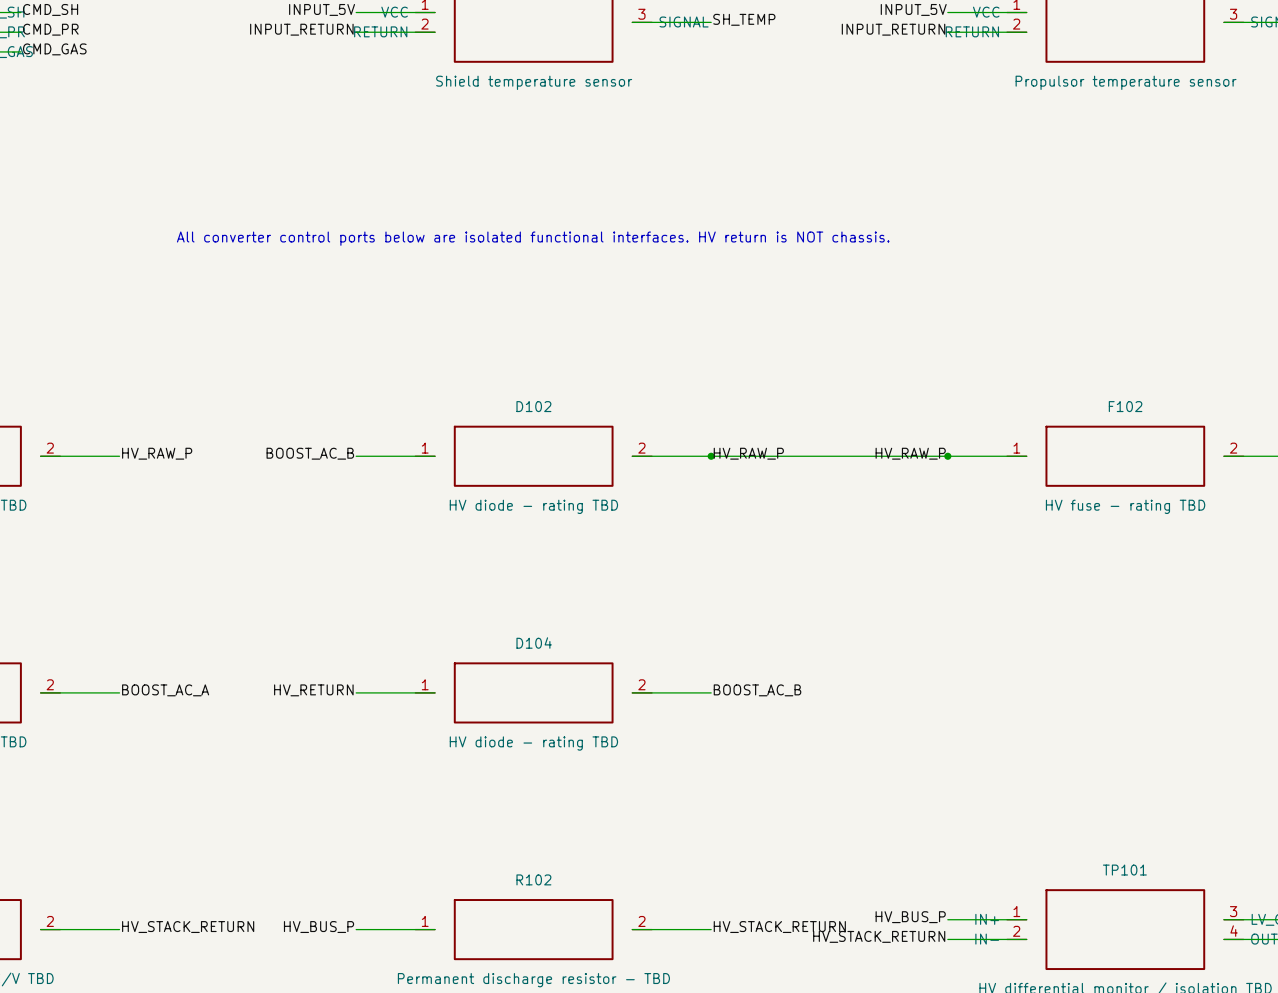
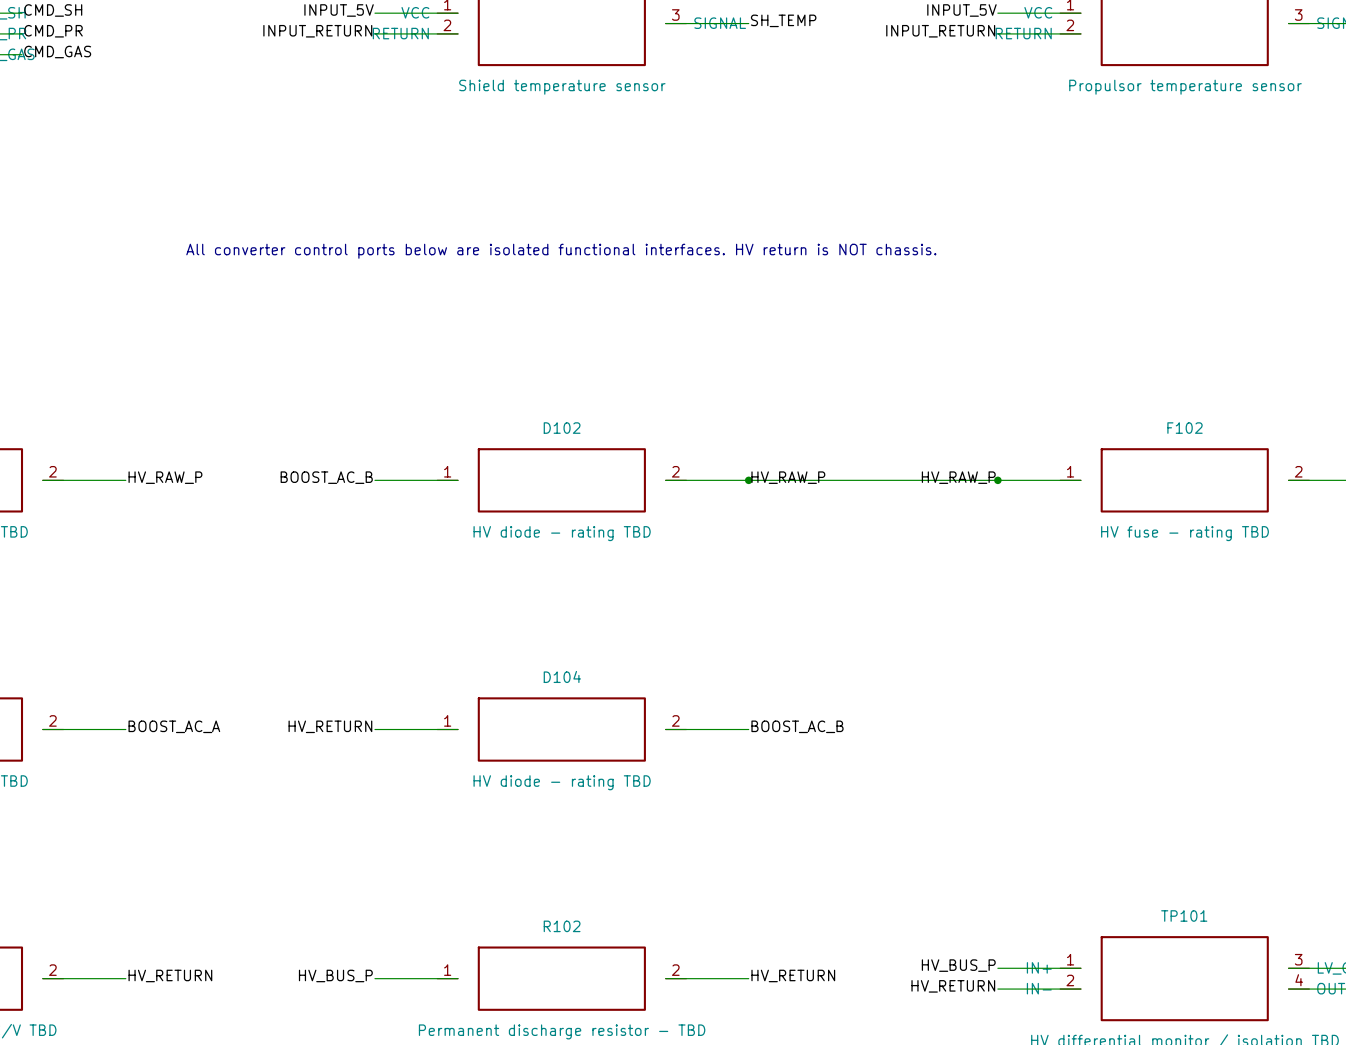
label: HV_STACK_RETURN (188, 927) -> HV_RETURN (170, 975)
label: HV_STACK_RETURN (779, 927) -> HV_RETURN (793, 975)
label: HV_STACK_RETURN (879, 936) -> HV_RETURN (953, 986)

